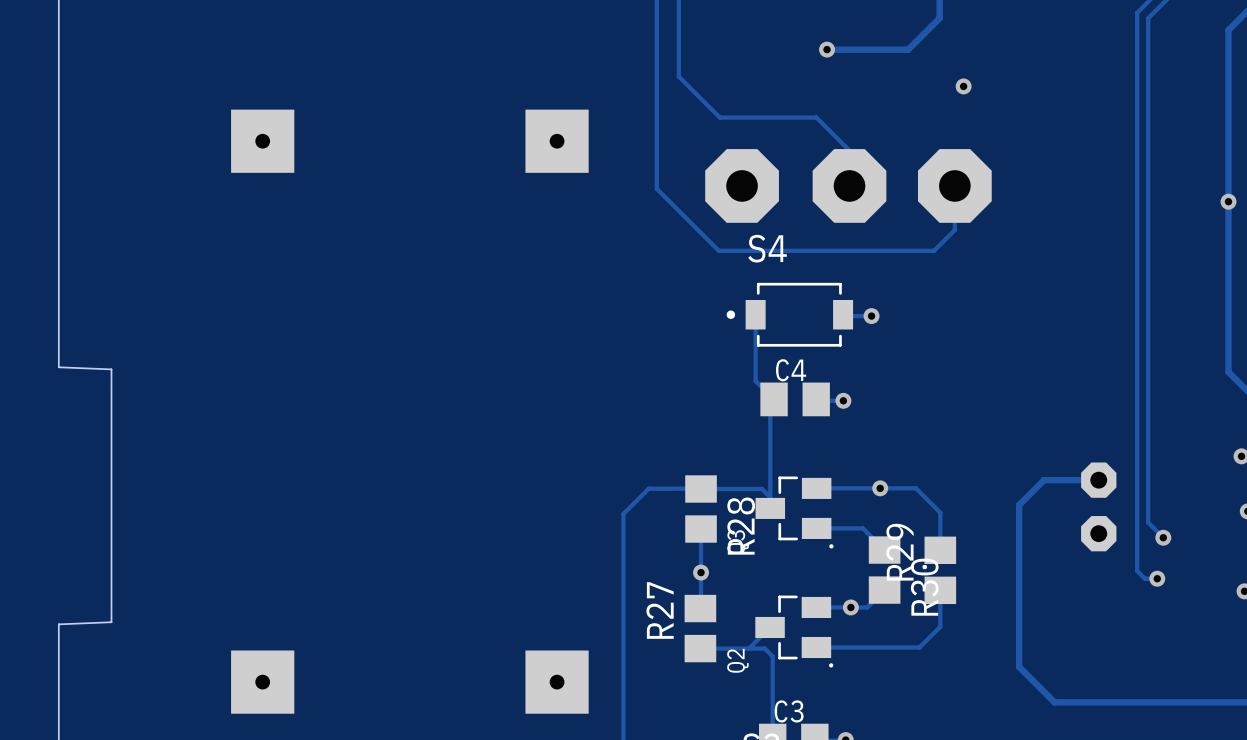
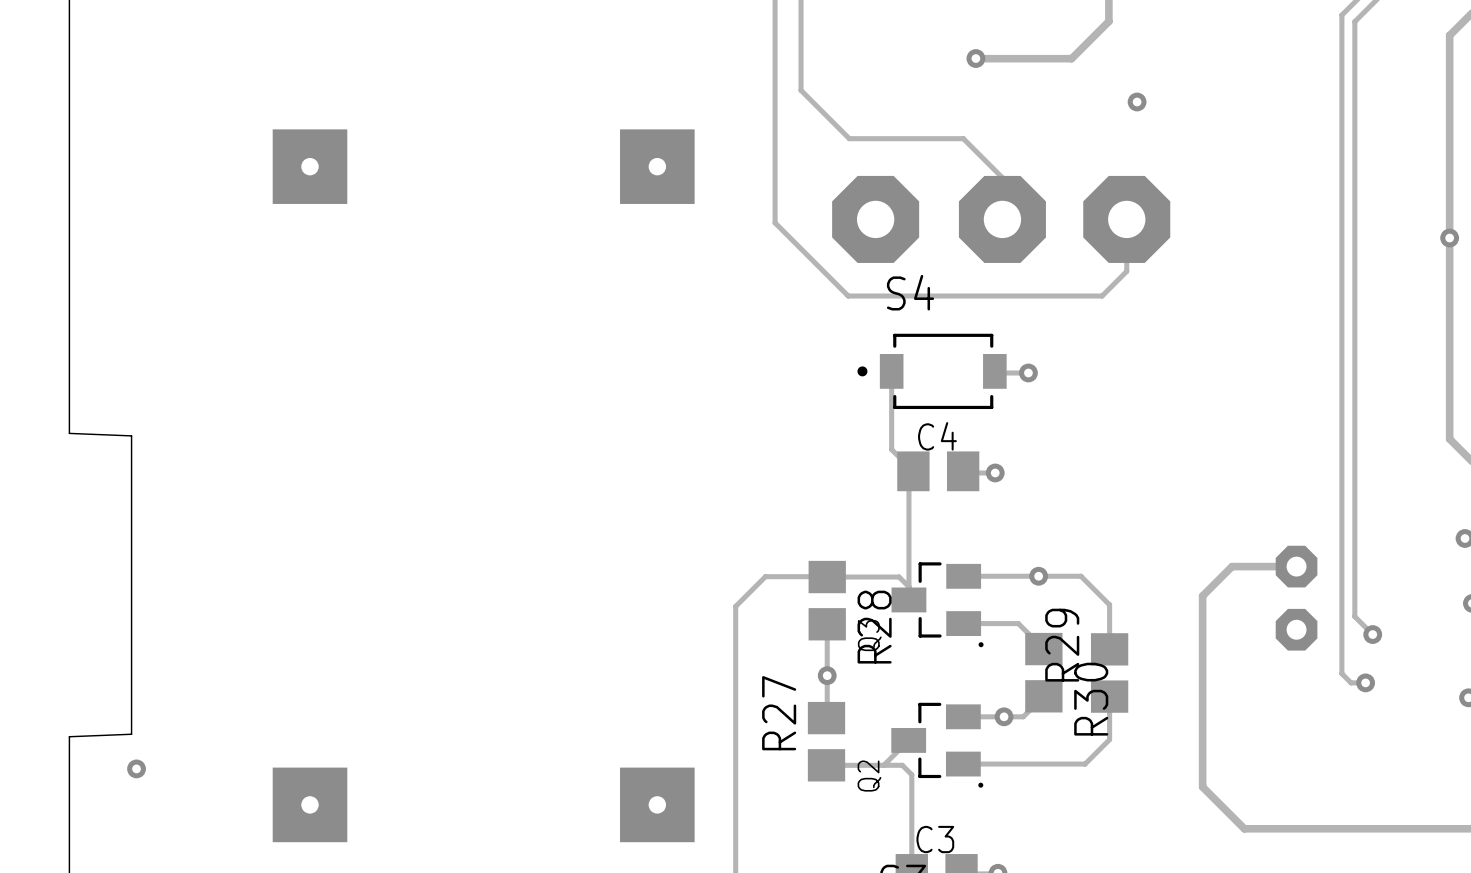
via: none -> (136, 768)

